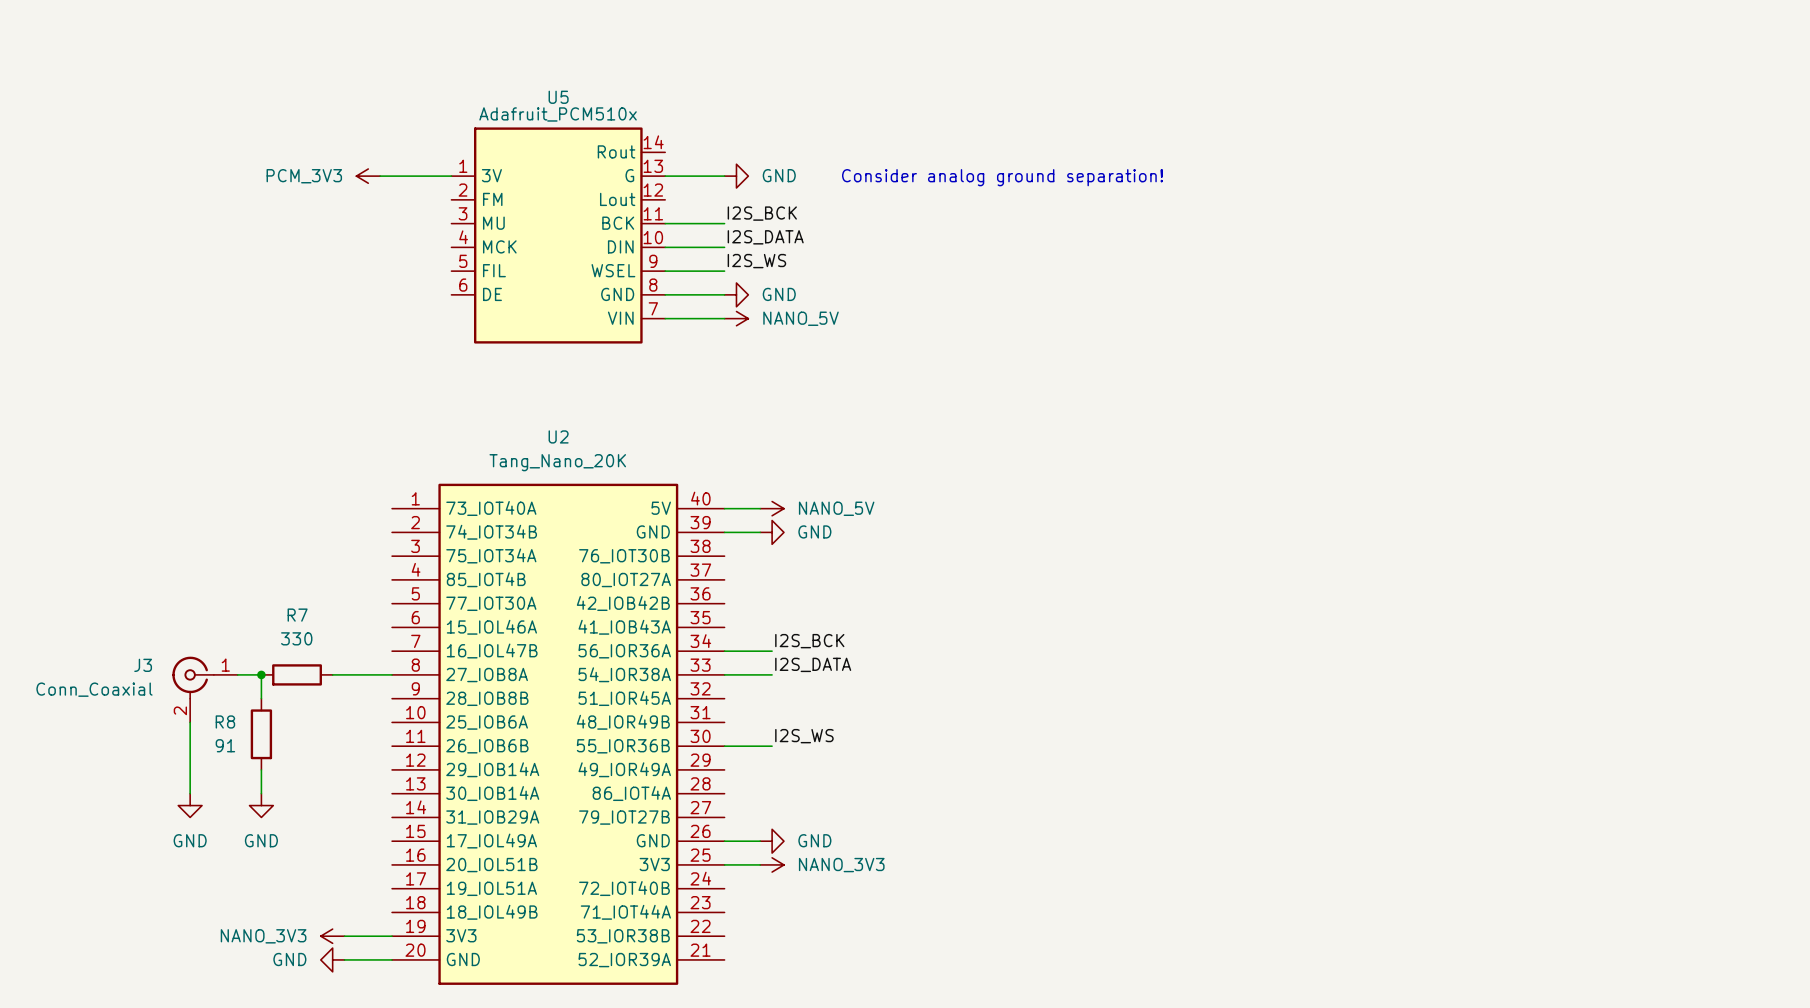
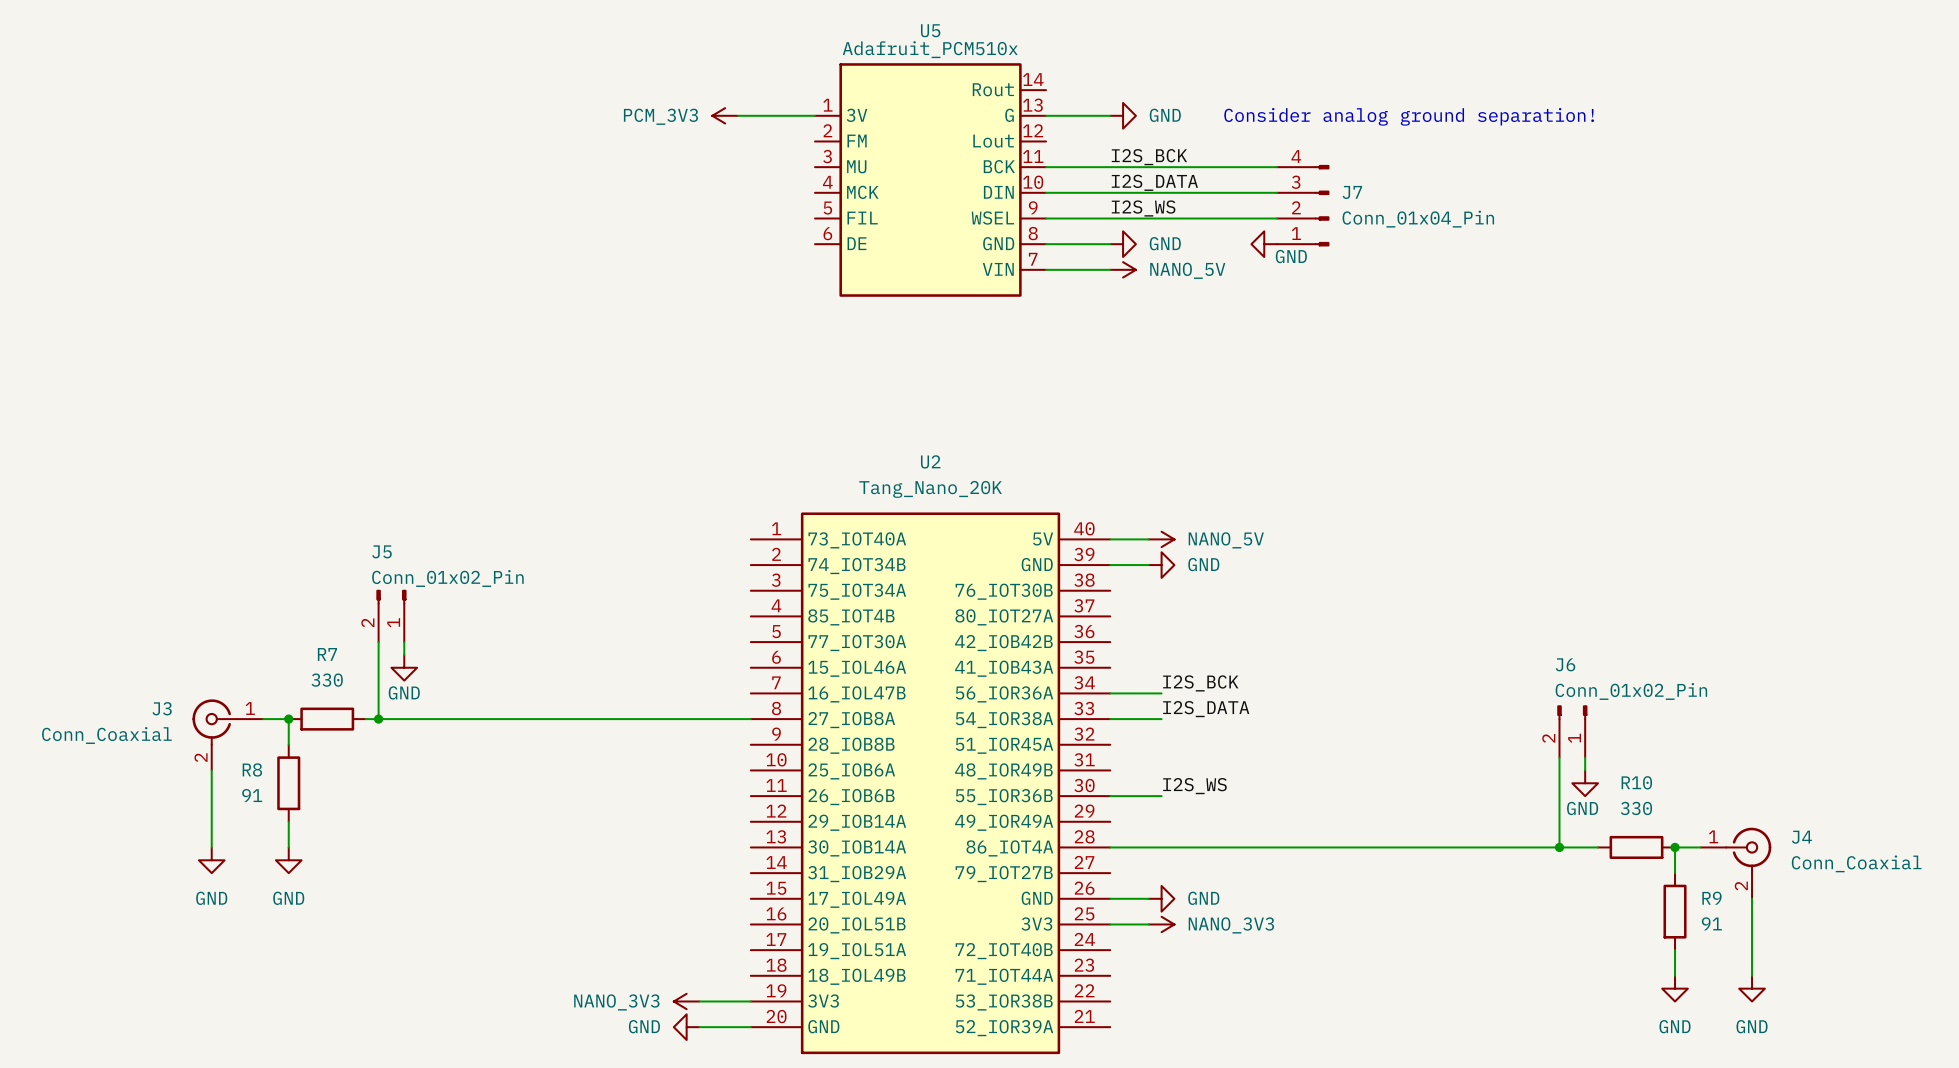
power symbol: none -> PCM_3V3 (725, 115)
wire: none -> (738, 115) (815, 115)
wire: none -> (1046, 115) (1110, 115)
power symbol: none -> GND (1123, 115)
text: none -> Consider analog ground separation! (1409, 116)
label: none -> I2S_BCK (1149, 157)
wire: none -> (1046, 167) (1277, 167)
power symbol: PCM_3V3 (368, 176) -> none
wire: (380, 176) (451, 176) -> none
wire: (665, 176) (724, 176) -> none
power symbol: GND (736, 176) -> none
text: Consider analog ground separation! (1002, 177) -> none
label: none -> I2S_DATA (1154, 182)
wire: none -> (1046, 192) (1277, 192)
J7: none -> Conn_01x04_Pin (1303, 205)
label: none -> I2S_WS (1143, 208)
wire: none -> (1046, 218) (1277, 218)
label: I2S_BCK (762, 213) -> none
wire: (665, 223) (724, 223) -> none
U5 position: (558, 235) -> (930, 179)
wire: none -> (1046, 244) (1110, 244)
power symbol: none -> GND (1123, 244)
power symbol: none -> GND (1264, 244)
label: I2S_DATA (765, 237) -> none
wire: (665, 247) (724, 247) -> none
wire: none -> (1046, 269) (1110, 269)
power symbol: none -> NANO_5V (1123, 269)
label: I2S_WS (756, 261) -> none
wire: (665, 271) (724, 271) -> none
wire: (665, 294) (724, 294) -> none
power symbol: GND (736, 294) -> none
wire: (665, 318) (724, 318) -> none
power symbol: NANO_5V (736, 318) -> none
power symbol: NANO_5V (772, 508) -> none
wire: none -> (1110, 539) (1148, 539)
power symbol: none -> NANO_5V (1161, 539)
power symbol: GND (772, 532) -> none
wire: none -> (1110, 565) (1148, 565)
power symbol: none -> GND (1161, 565)
J5: none -> Conn_01x02_Pin (391, 616)
wire: none -> (378, 642) (378, 719)
wire: none -> (404, 642) (404, 654)
power symbol: none -> GND (404, 667)
label: I2S_BCK (809, 641) -> none
label: none -> I2S_BCK (1200, 683)
wire: none -> (1110, 693) (1161, 693)
label: I2S_DATA (813, 664) -> none
label: none -> I2S_DATA (1206, 709)
junction: none -> (378, 719)
wire: none -> (1110, 719) (1161, 719)
J6: none -> Conn_01x02_Pin (1572, 731)
wire: none -> (1559, 757) (1559, 847)
wire: none -> (1585, 757) (1585, 770)
U2 position: (558, 734) -> (930, 783)
power symbol: none -> GND (1585, 783)
label: I2S_WS (804, 736) -> none
label: none -> I2S_WS (1194, 786)
wire: none -> (1110, 796) (1161, 796)
wire: none -> (1110, 847) (1598, 847)
junction: none -> (1559, 847)
R10: none -> 330 (1636, 847)
junction: none -> (1675, 847)
wire: none -> (1700, 847) (1675, 847) (1675, 873)
J4: none -> Conn_Coaxial (1735, 863)
power symbol: GND (772, 841) -> none
wire: none -> (1110, 898) (1148, 898)
power symbol: none -> GND (1161, 898)
wire: none -> (1752, 898) (1752, 975)
R9: none -> 91 (1675, 911)
power symbol: NANO_3V3 (772, 864) -> none
wire: none -> (1110, 924) (1148, 924)
power symbol: none -> NANO_3V3 (1161, 924)
wire: none -> (1675, 950) (1675, 975)
power symbol: none -> GND (1675, 988)
power symbol: none -> GND (1752, 988)
power symbol: NANO_3V3 (332, 936) -> none
wire: (344, 936) (392, 936) -> none
power symbol: none -> NANO_3V3 (686, 1001)
power symbol: GND (332, 959) -> none
wire: (344, 959) (392, 959) -> none
power symbol: none -> GND (686, 1027)

